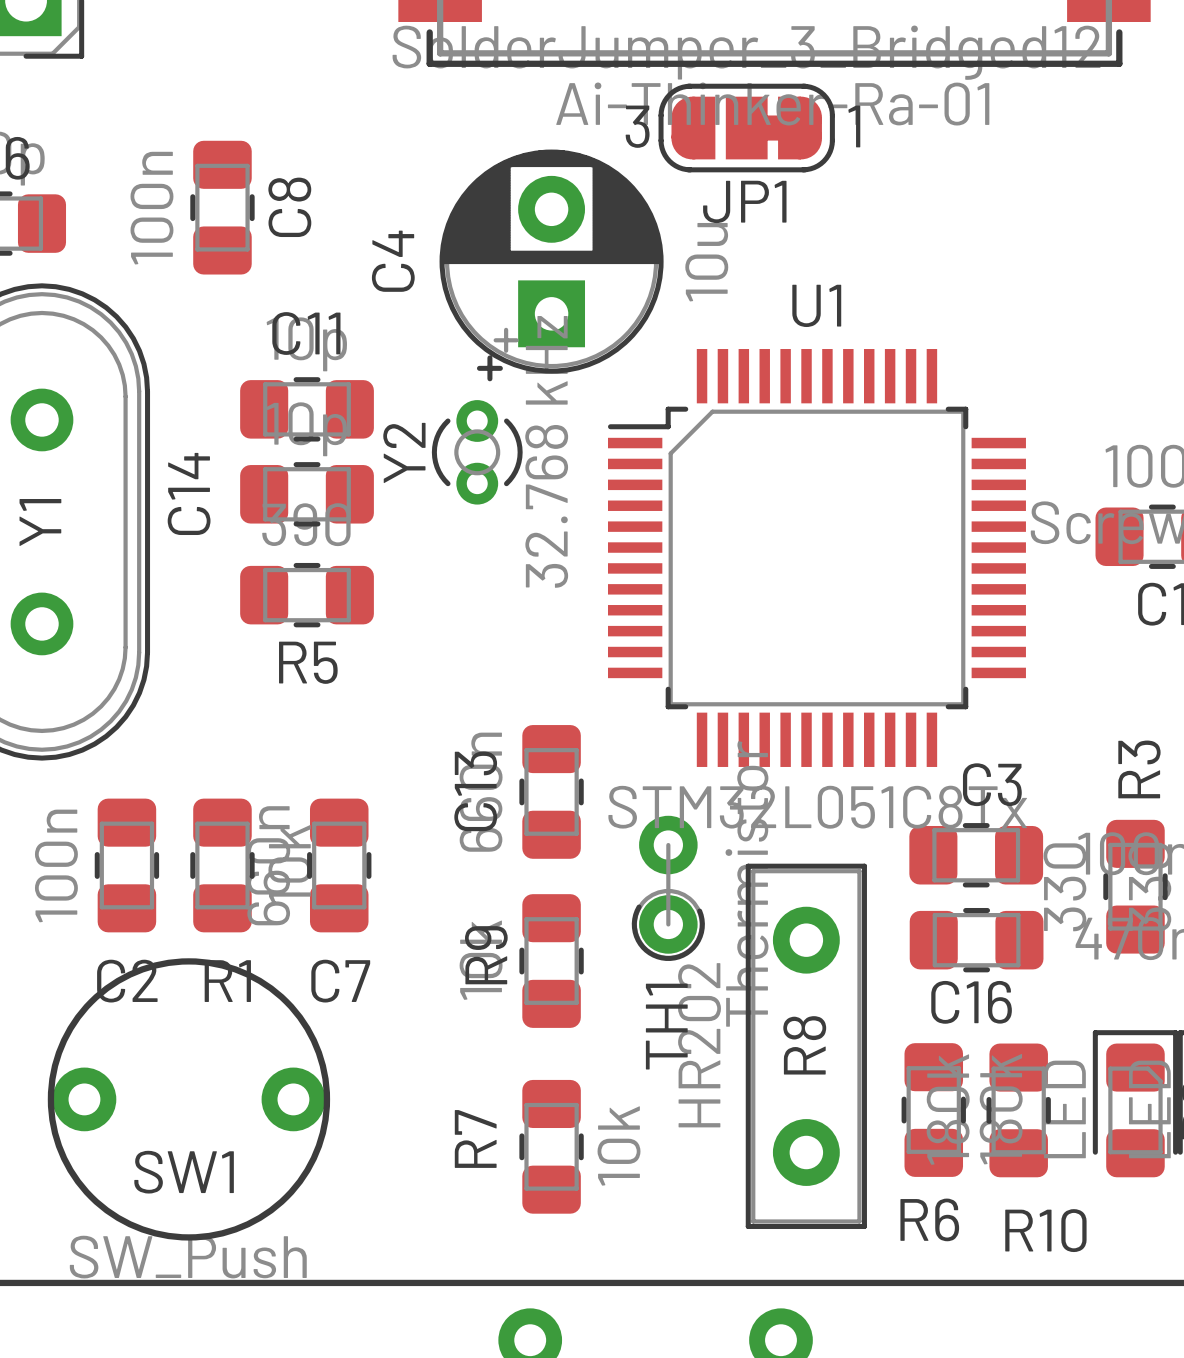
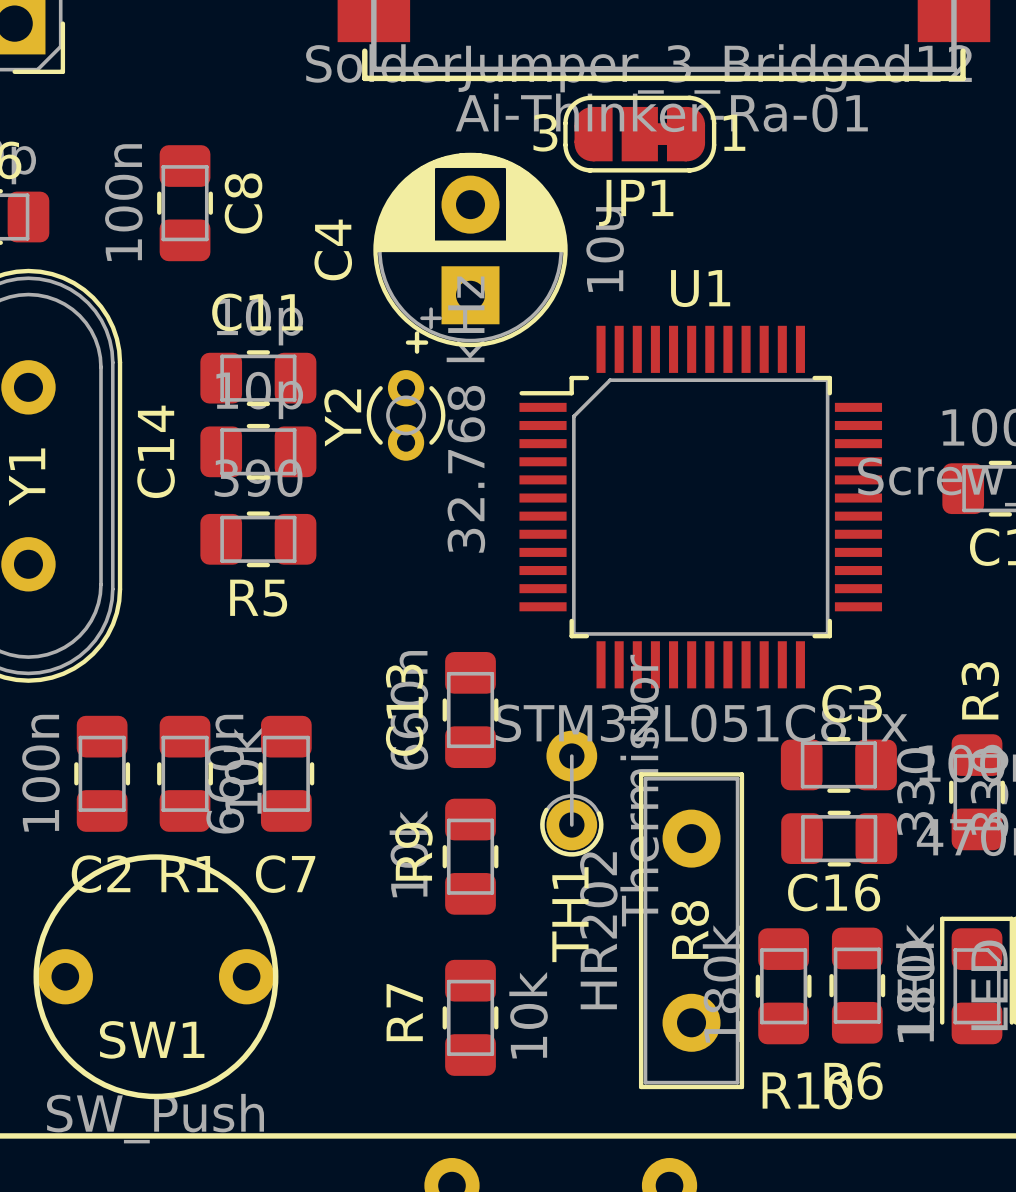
R6 position: (933, 1110) -> (857, 985)
R10 position: (1018, 1110) -> (783, 986)

